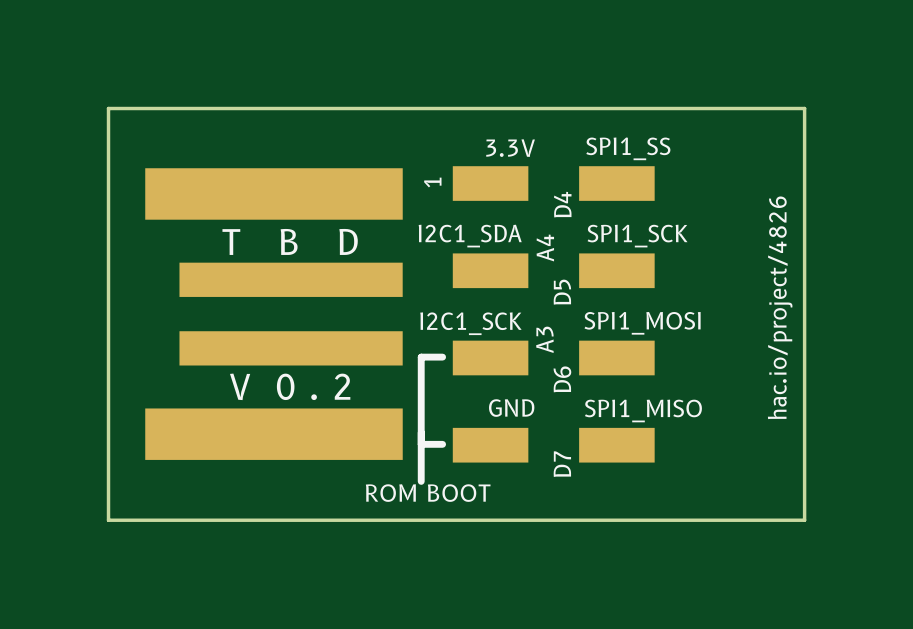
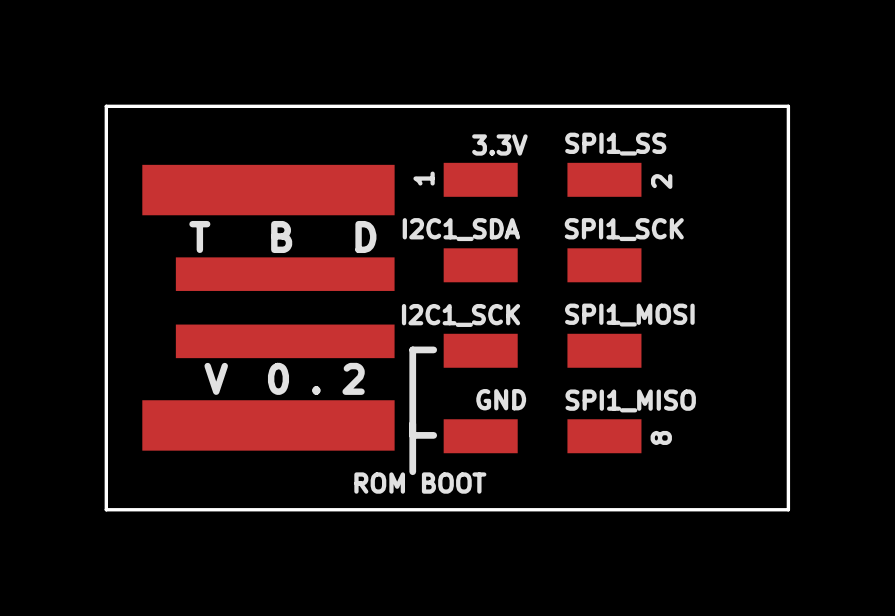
text: none -> 2 (661, 181)
text: D4 (562, 204) -> none
text: A4 (545, 248) -> none
text: D5 (562, 292) -> none
text: hac.io/project/4826 (780, 307) -> none
text: A3 (544, 339) -> none
text: D6 (562, 379) -> none
text: none -> 8 (661, 437)
text: D7 (562, 464) -> none

